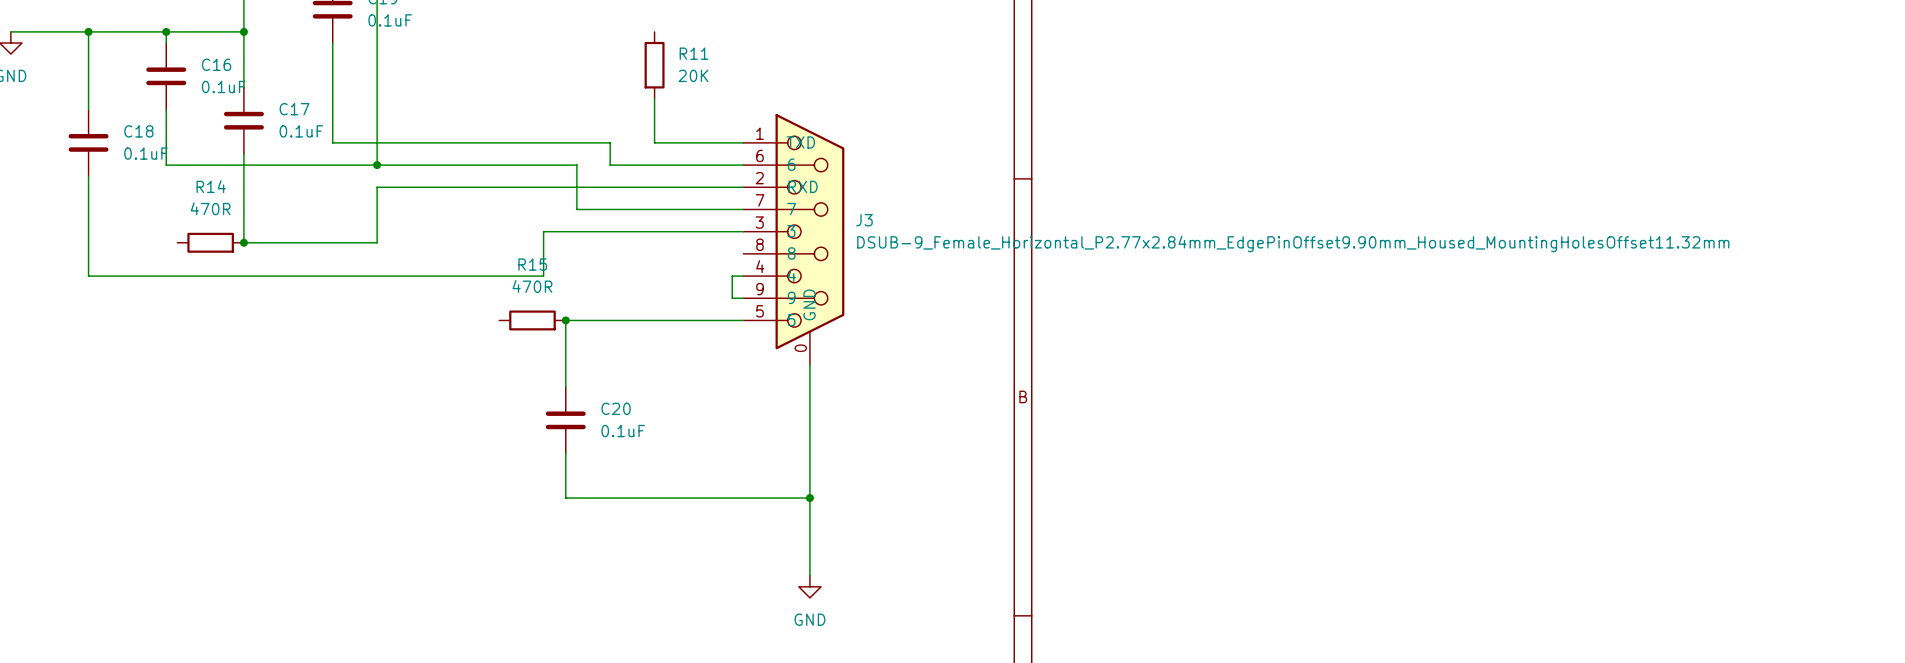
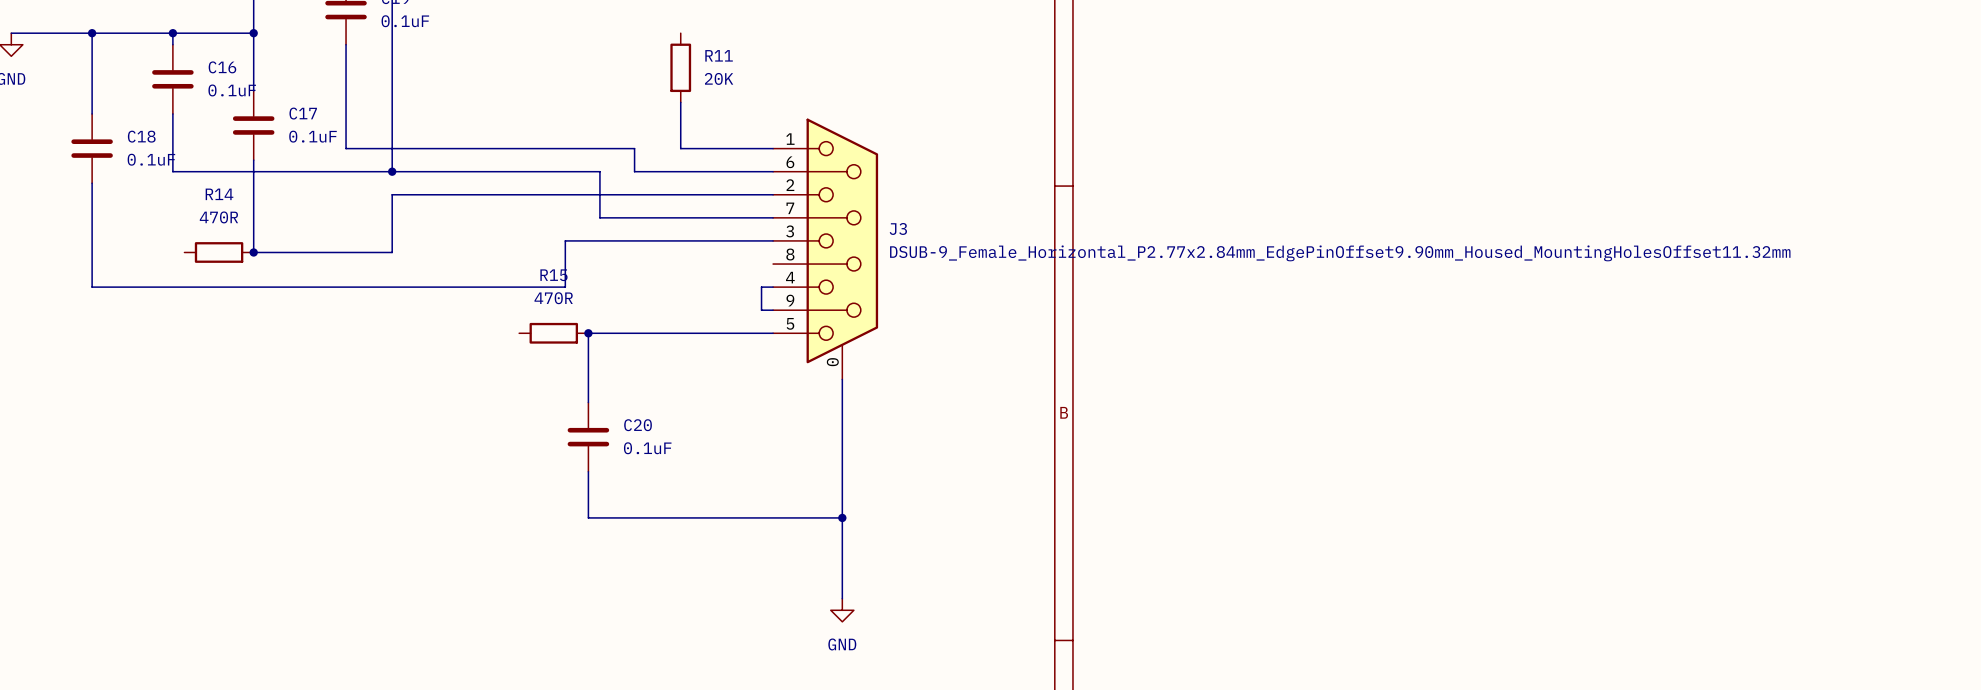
J3 symbol: [743, 114, 845, 365] -> [773, 118, 879, 380]

